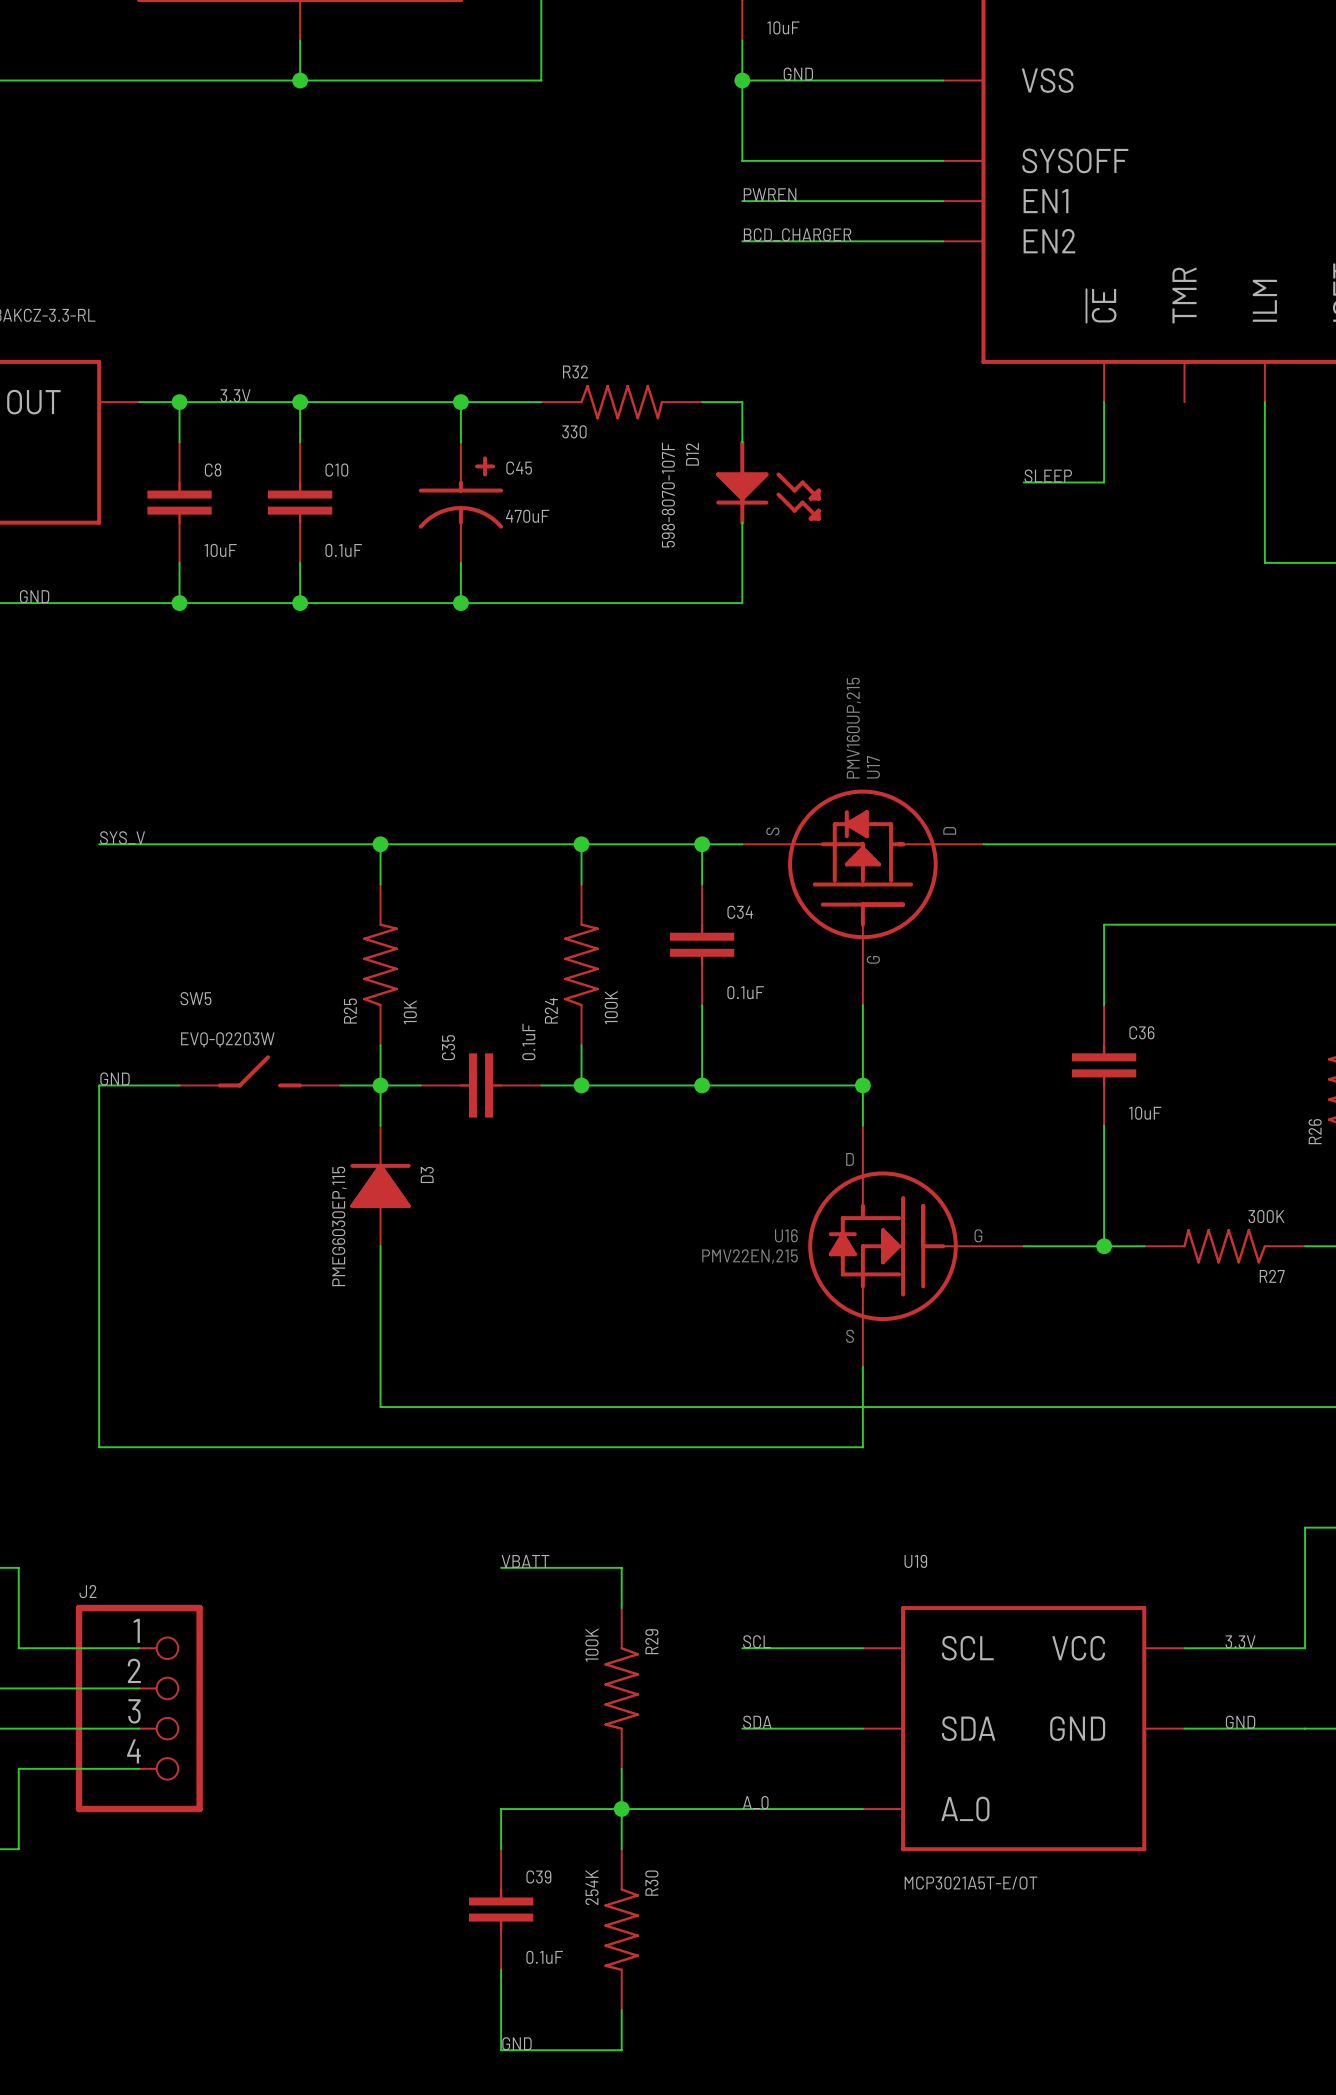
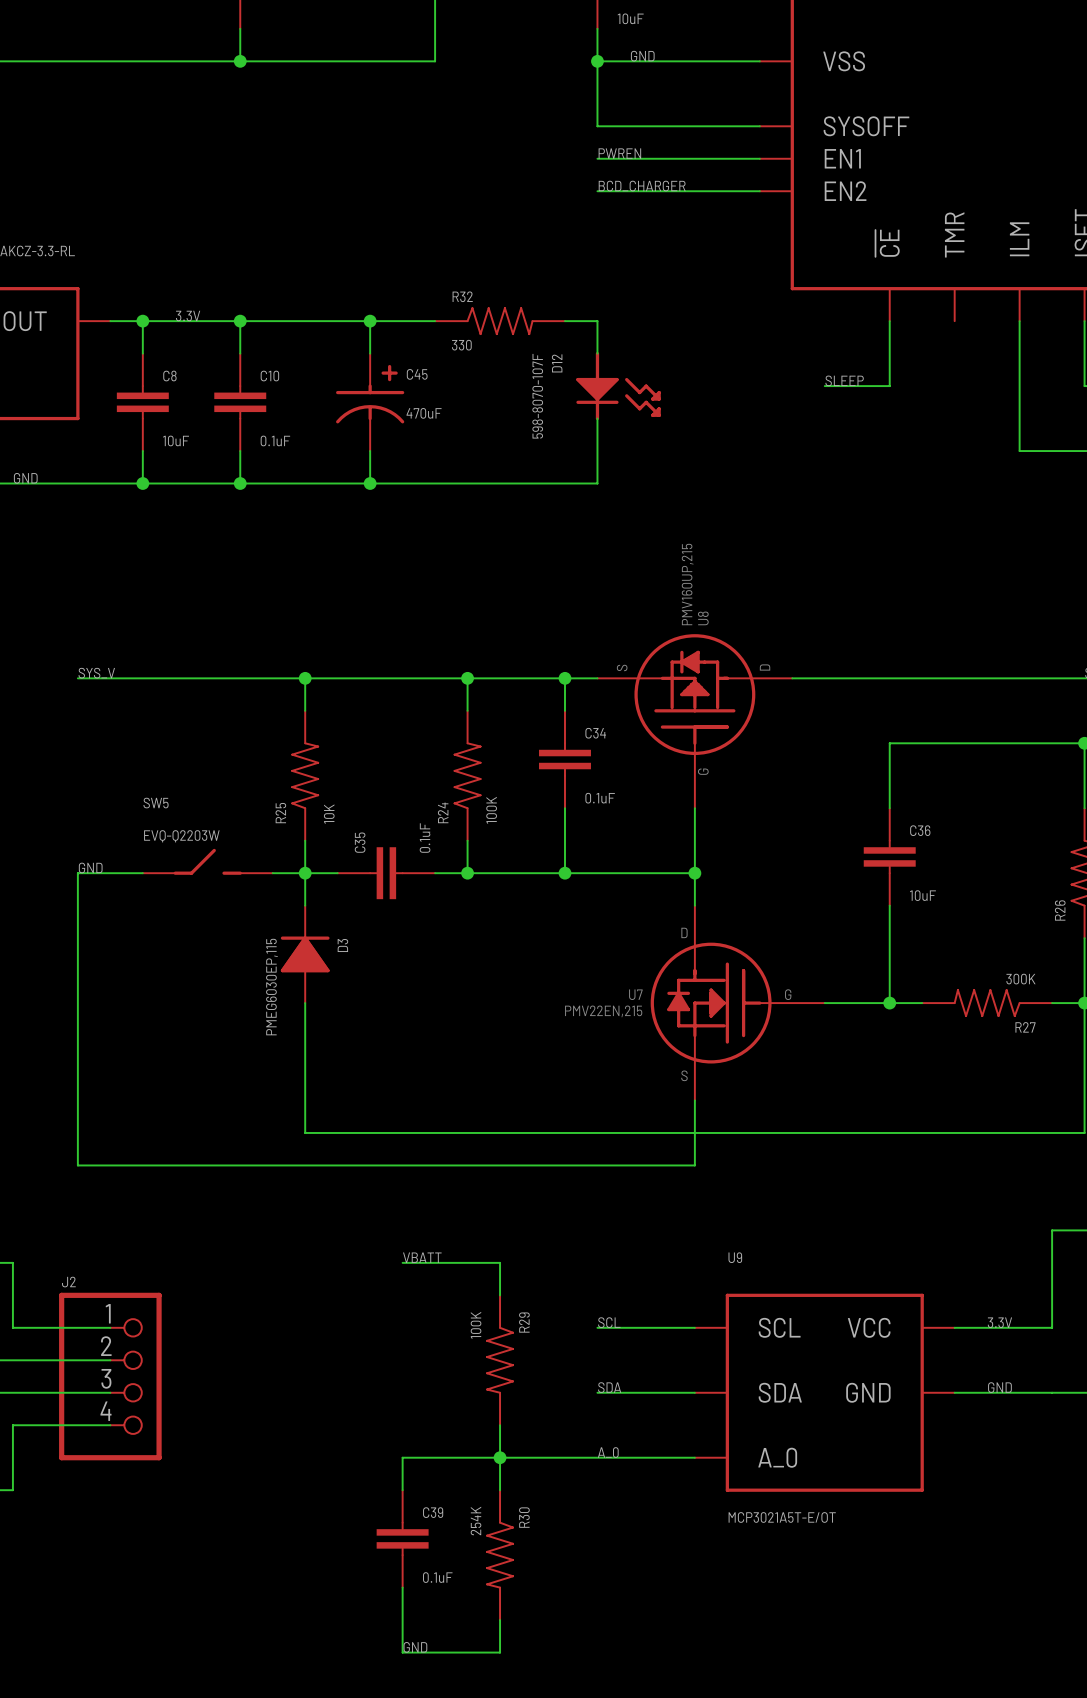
U17 name: U17 (873, 767) -> U8 (703, 618)
U16 name: U16 (786, 1235) -> U7 (635, 994)
U19 name: U19 (915, 1561) -> U9 (735, 1257)

